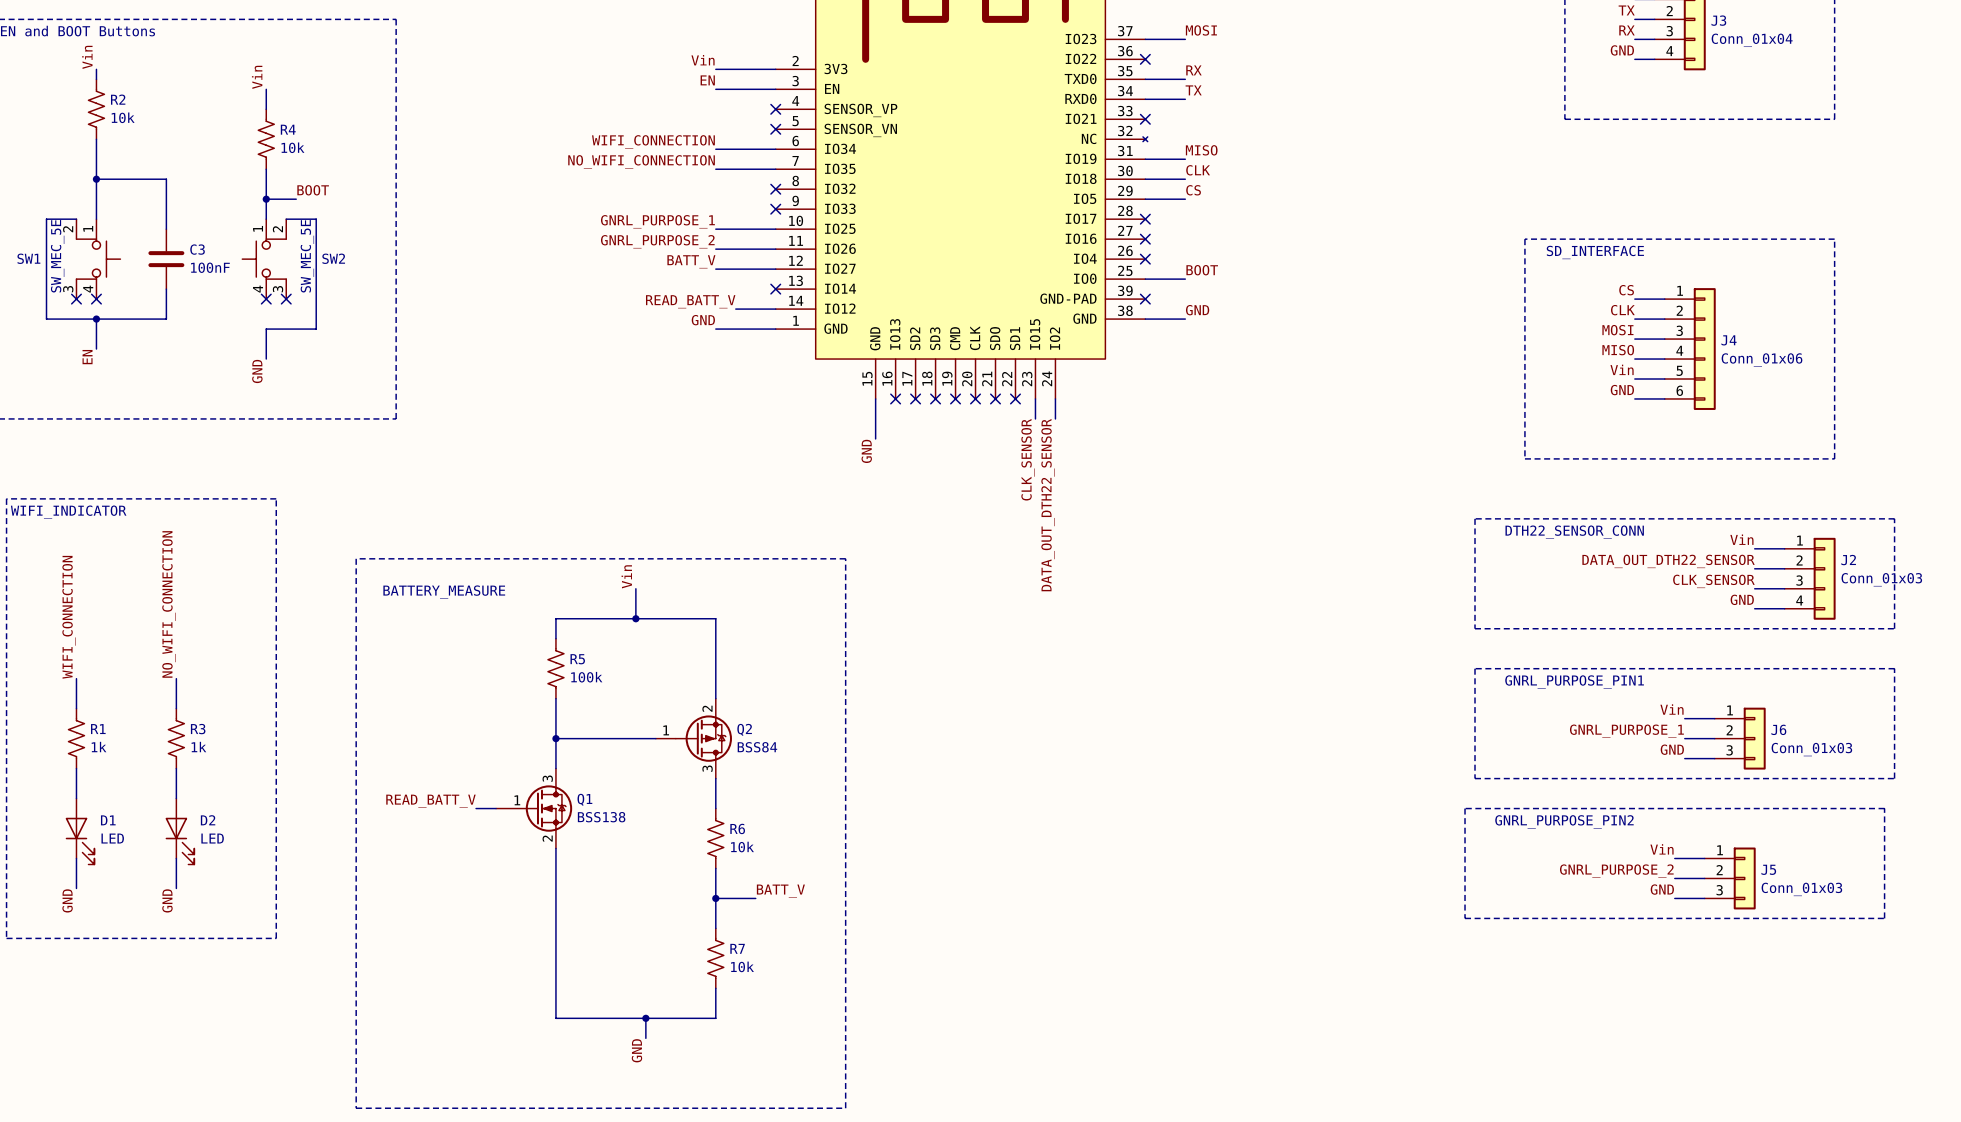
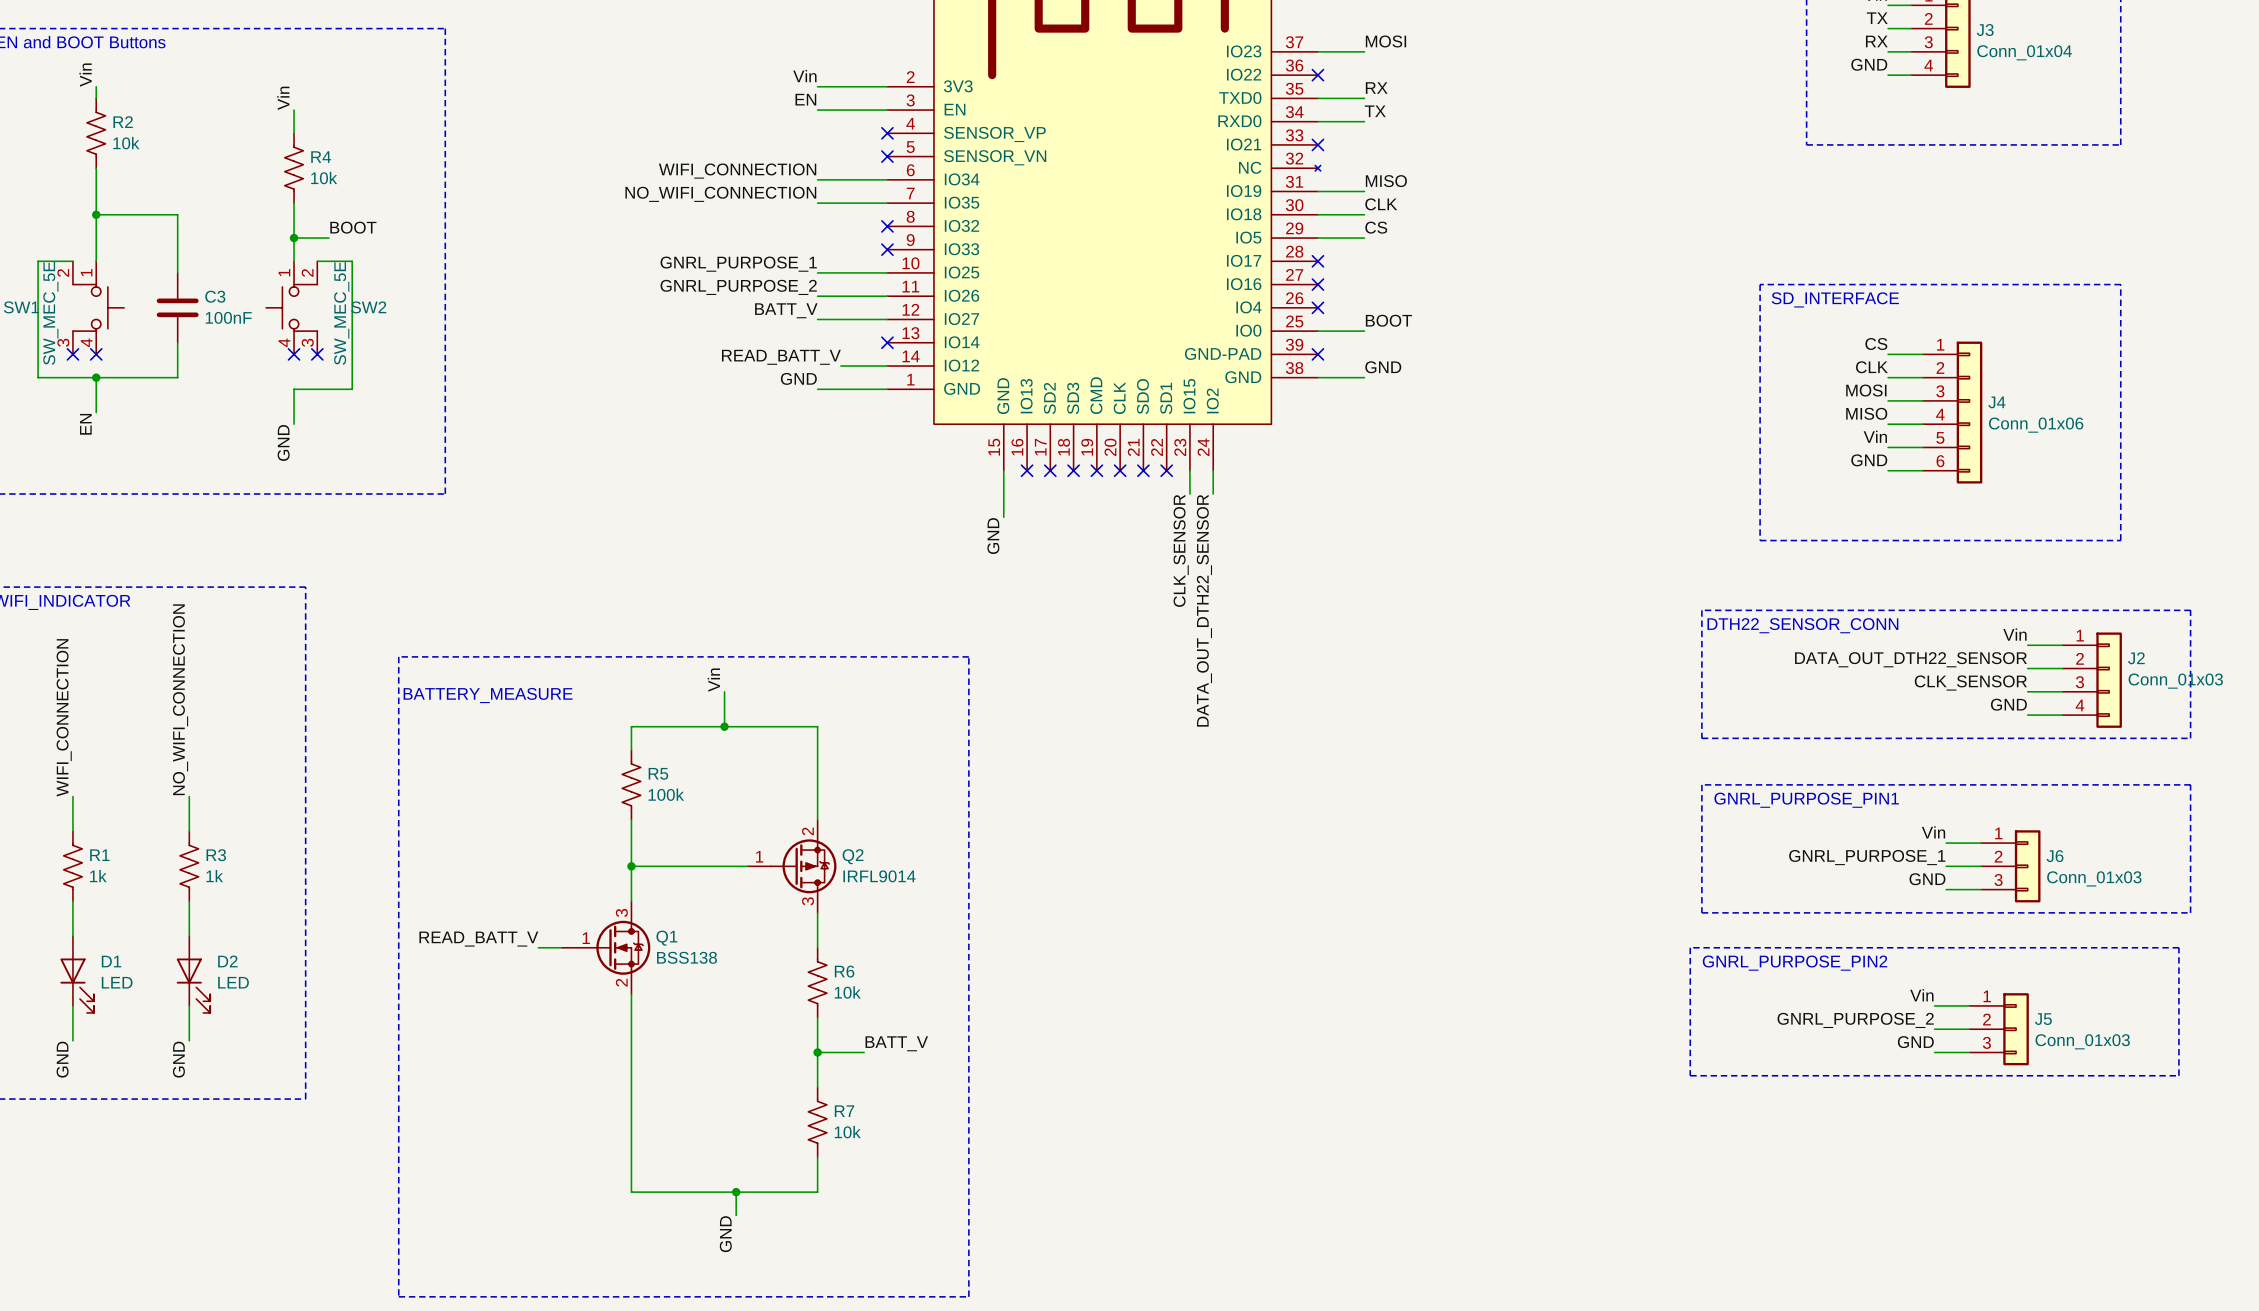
Q2 value: BSS84 (757, 747) -> IRFL9014 (879, 876)

